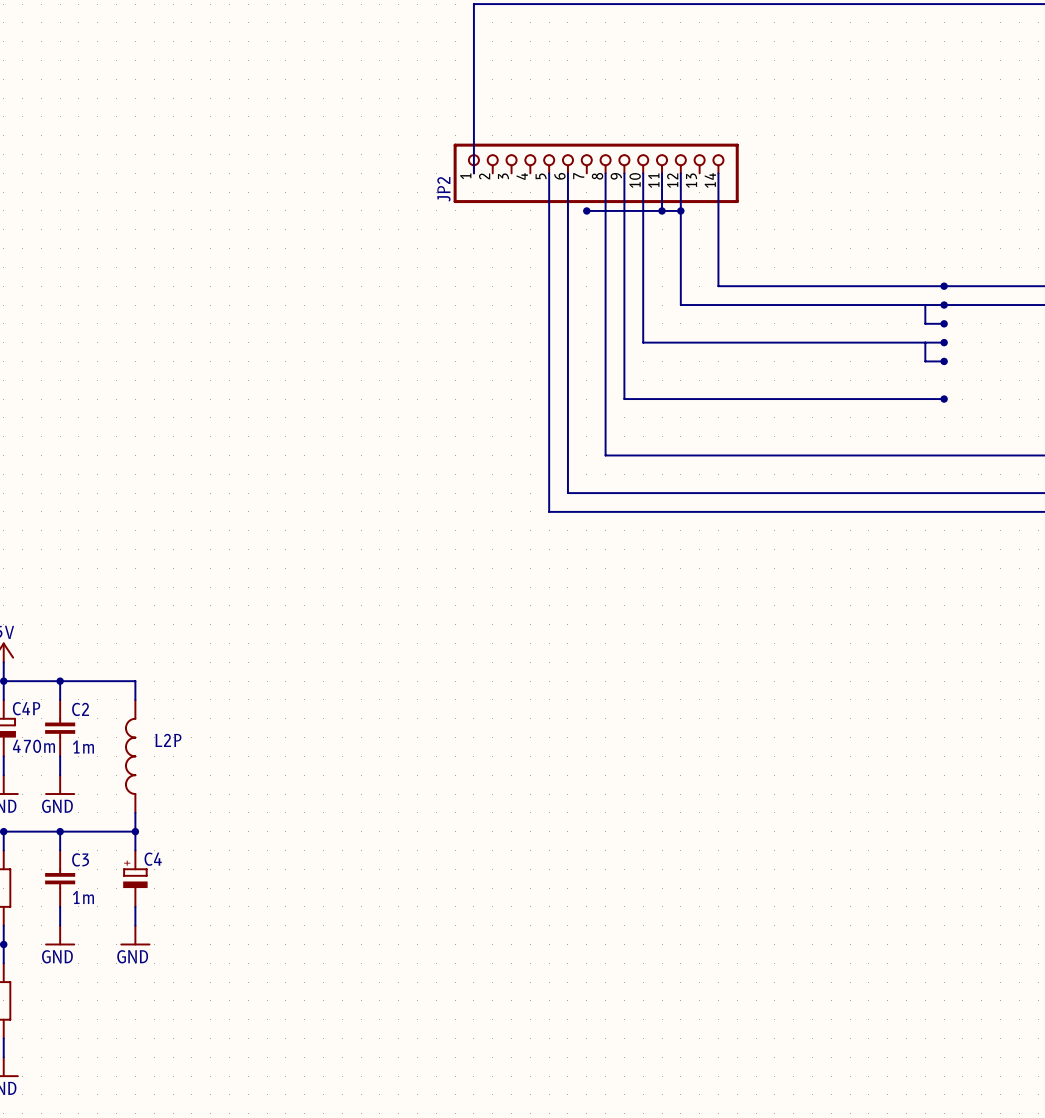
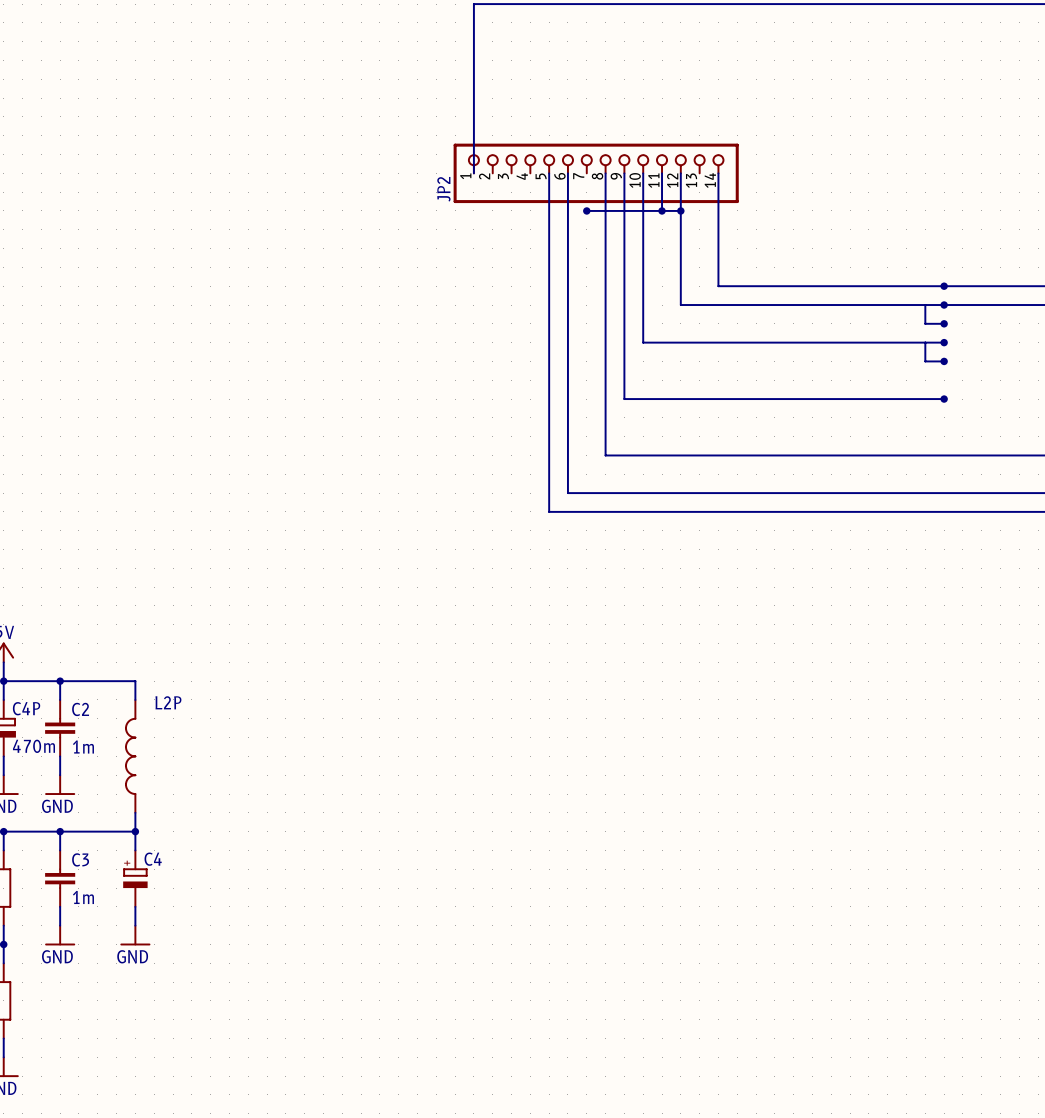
L2P name position: L2P (168, 740) -> L2P (168, 702)

